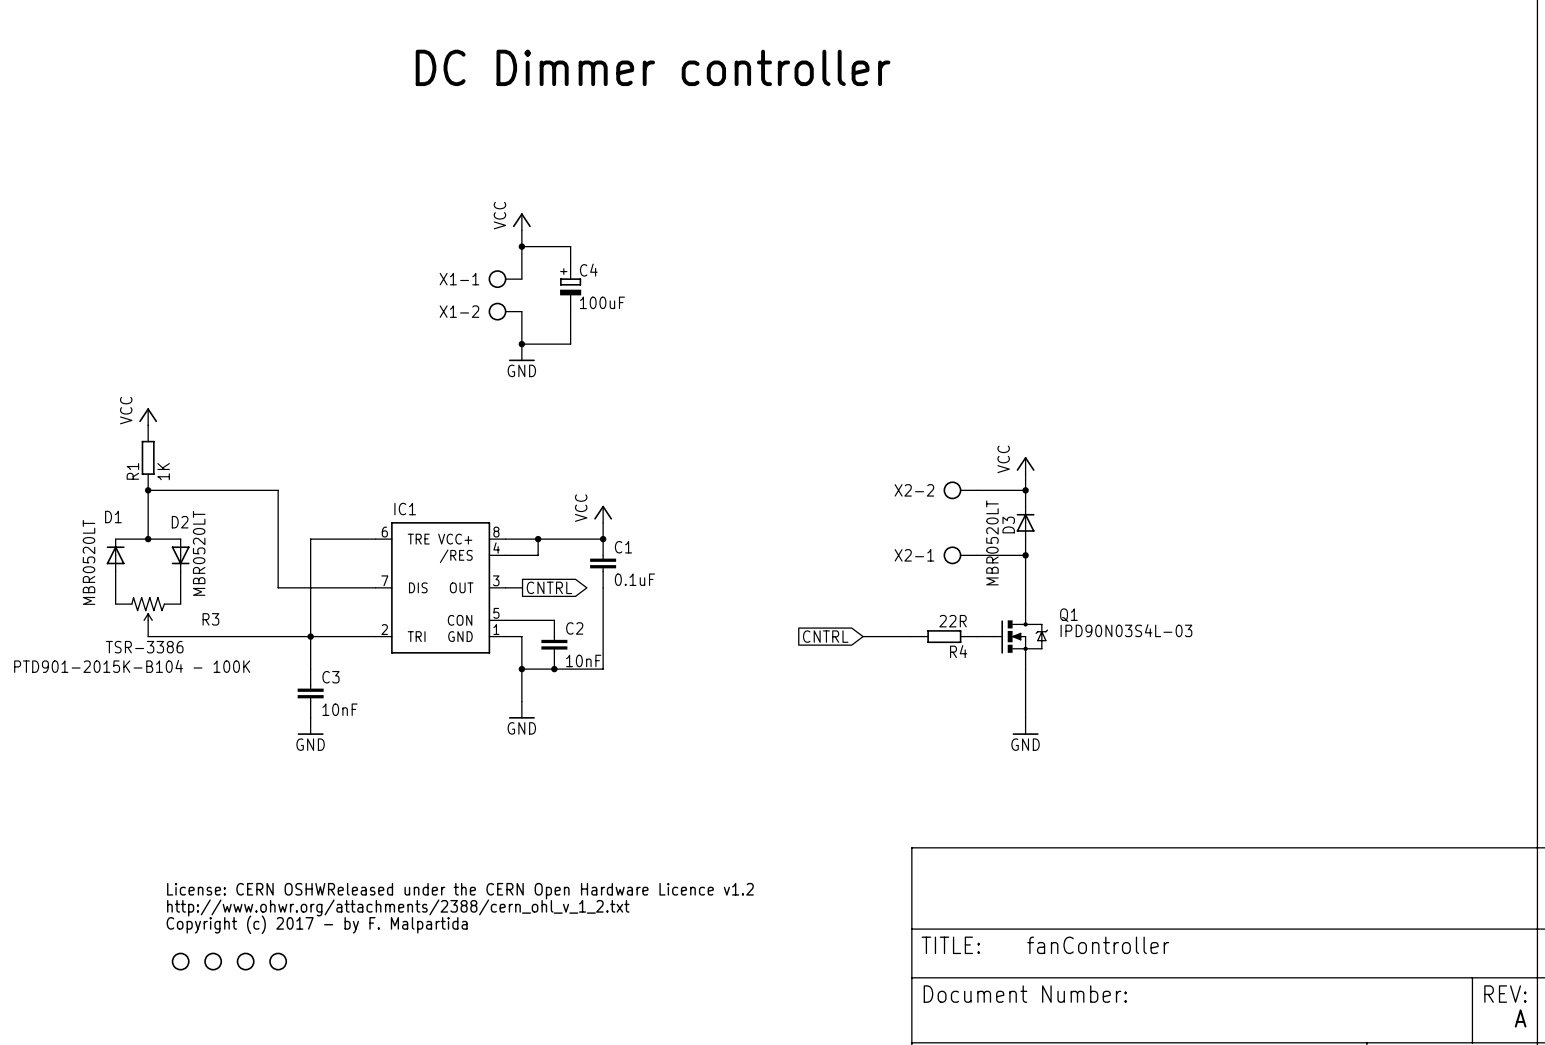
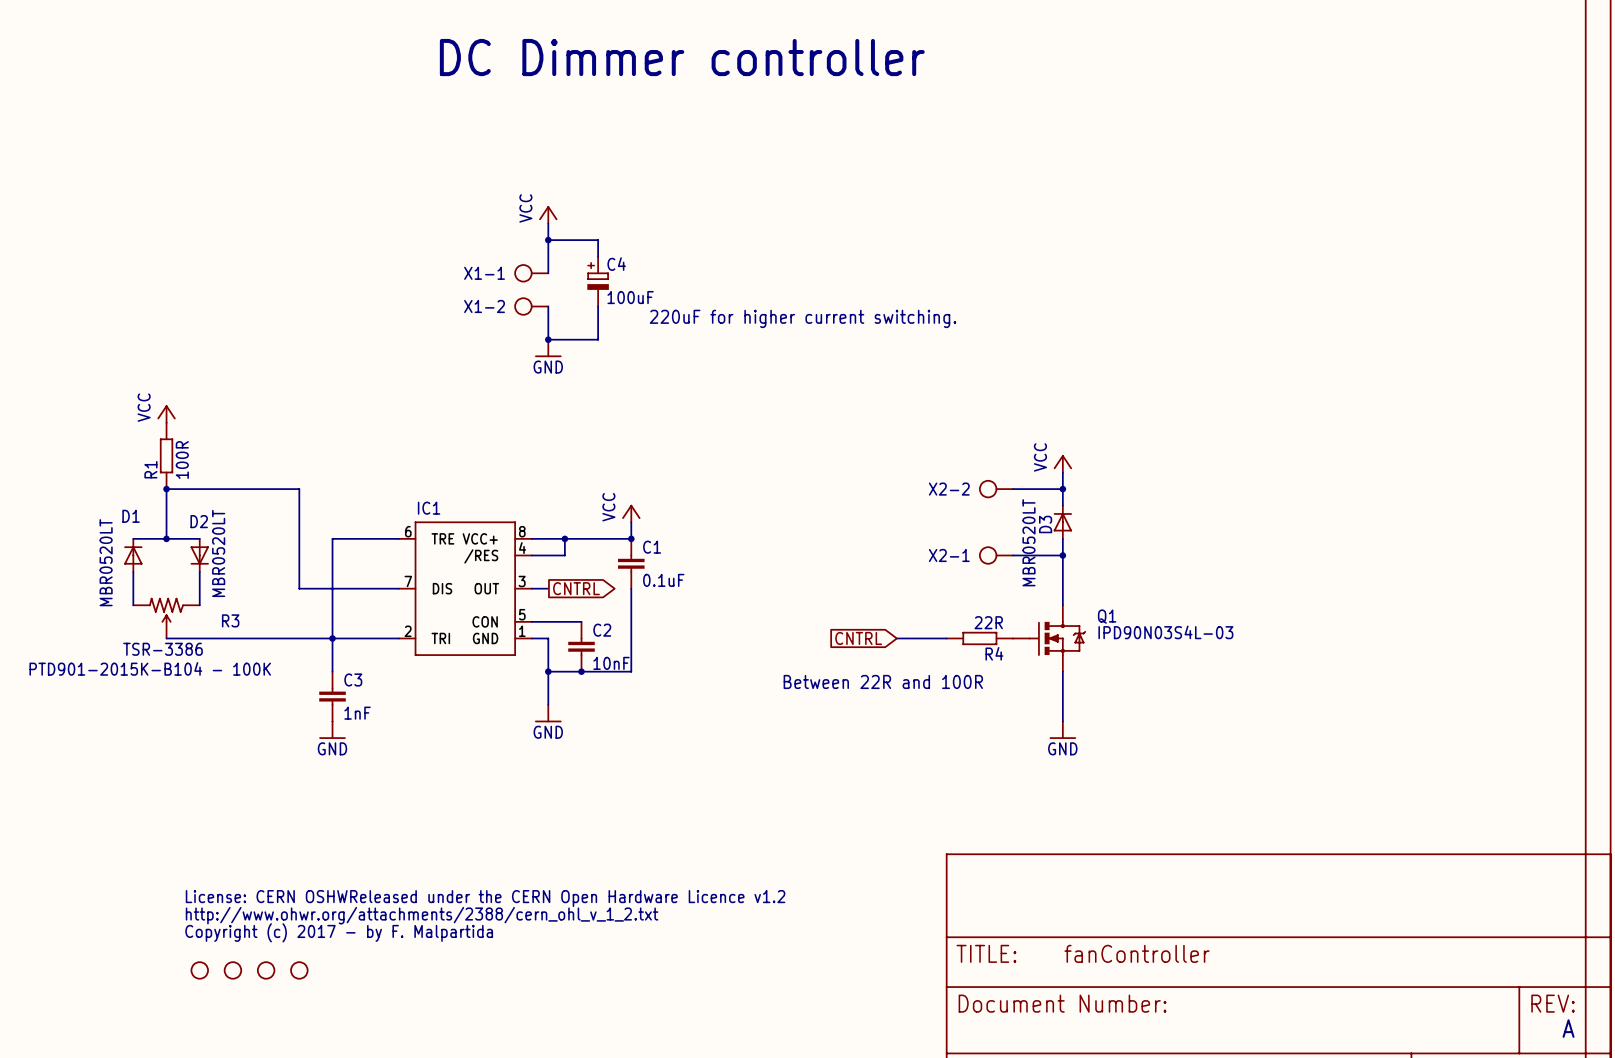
text: none -> 220uF for higher current switching. (802, 318)
R1 value: 1K (163, 471) -> 100R (182, 460)
text: none -> Between 22R and 100R (883, 681)
C3 value: 10nF (340, 709) -> 1nF (357, 713)

